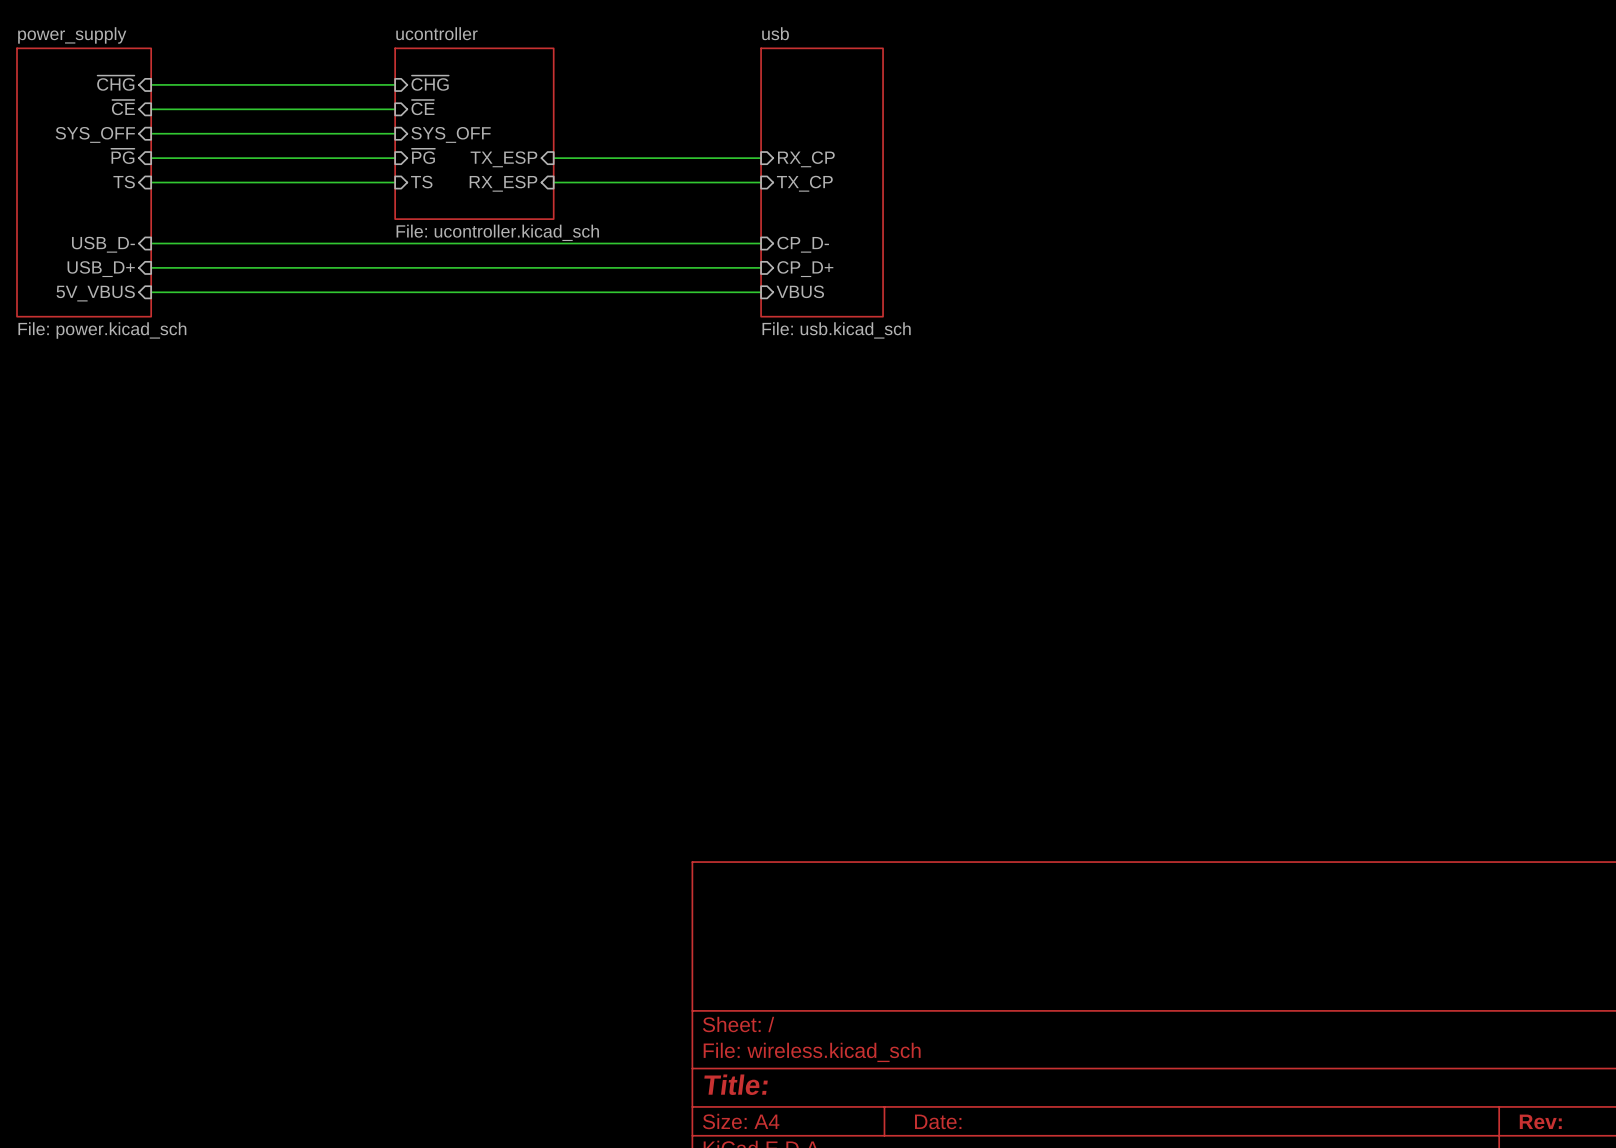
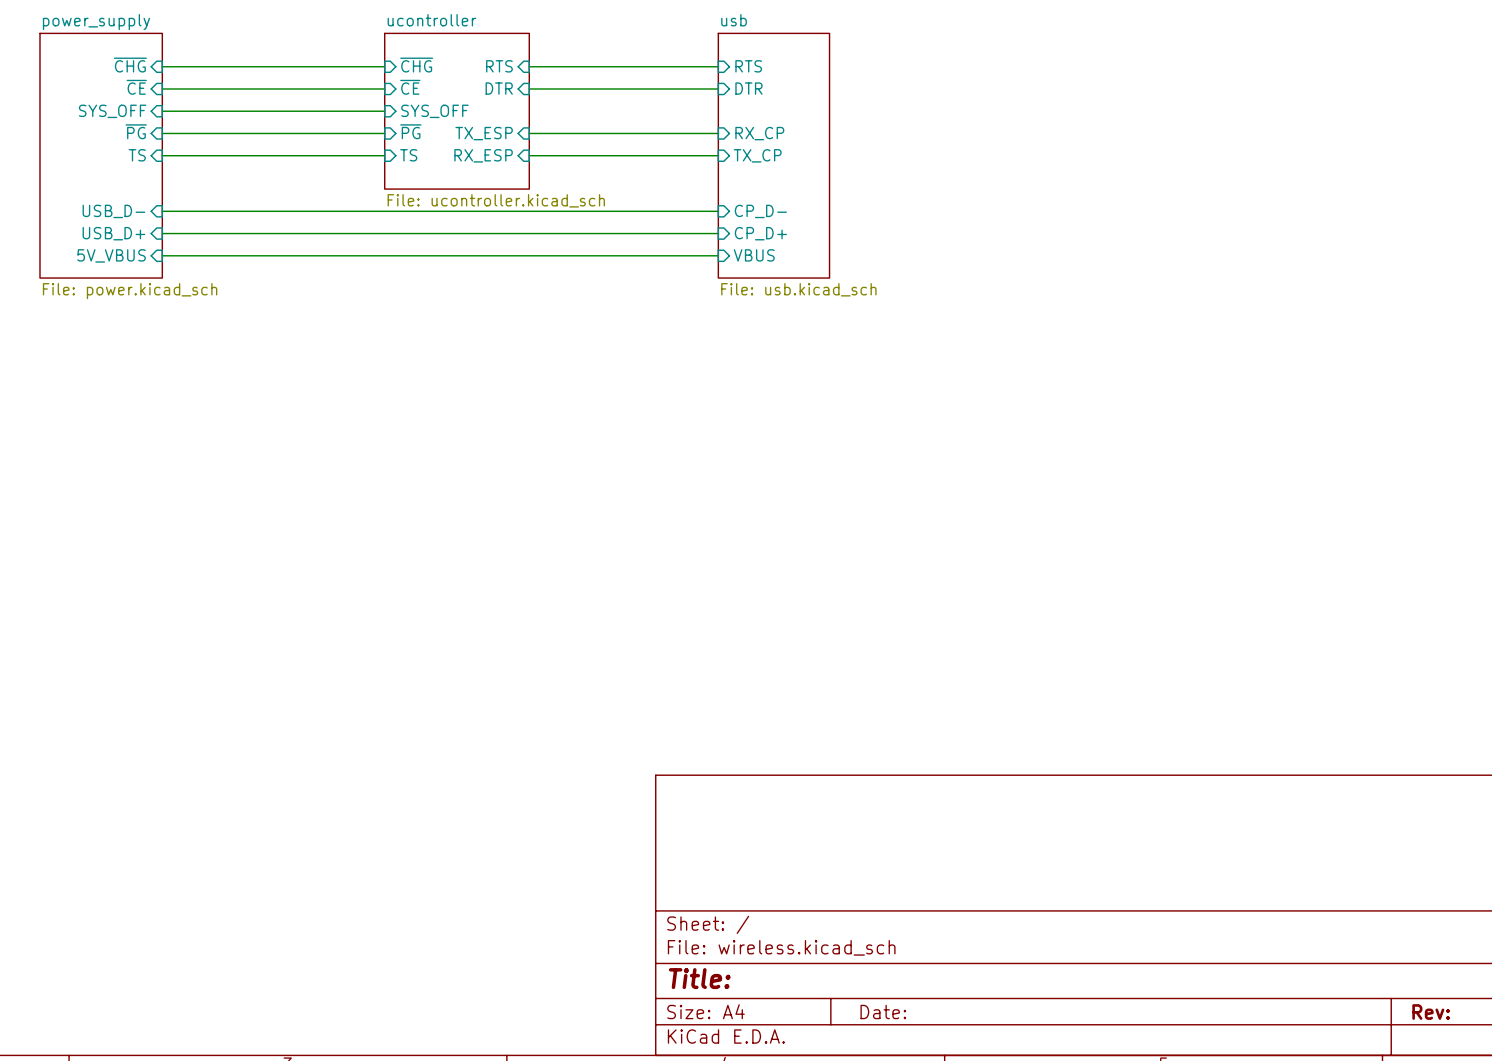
sheet pin: none -> RTS (499, 66)
wire: none -> (529, 66) (718, 66)
sheet pin: none -> RTS (748, 66)
sheet pin: none -> DTR (499, 88)
sheet pin: none -> DTR (748, 88)
wire: none -> (529, 88) (718, 88)

